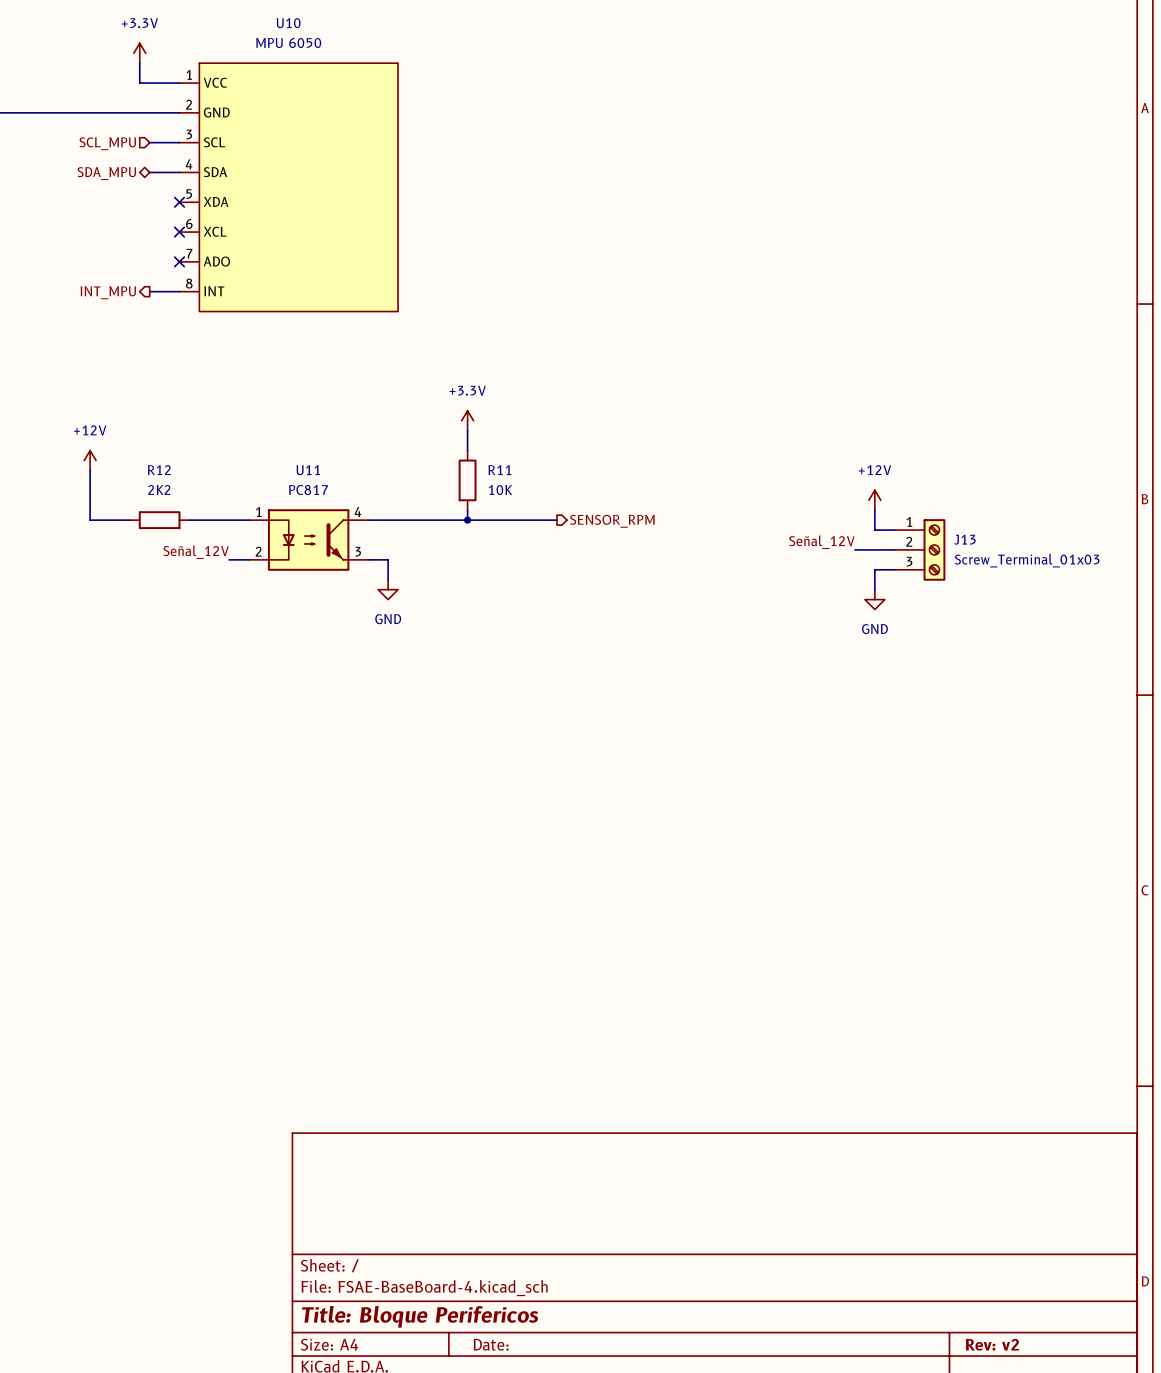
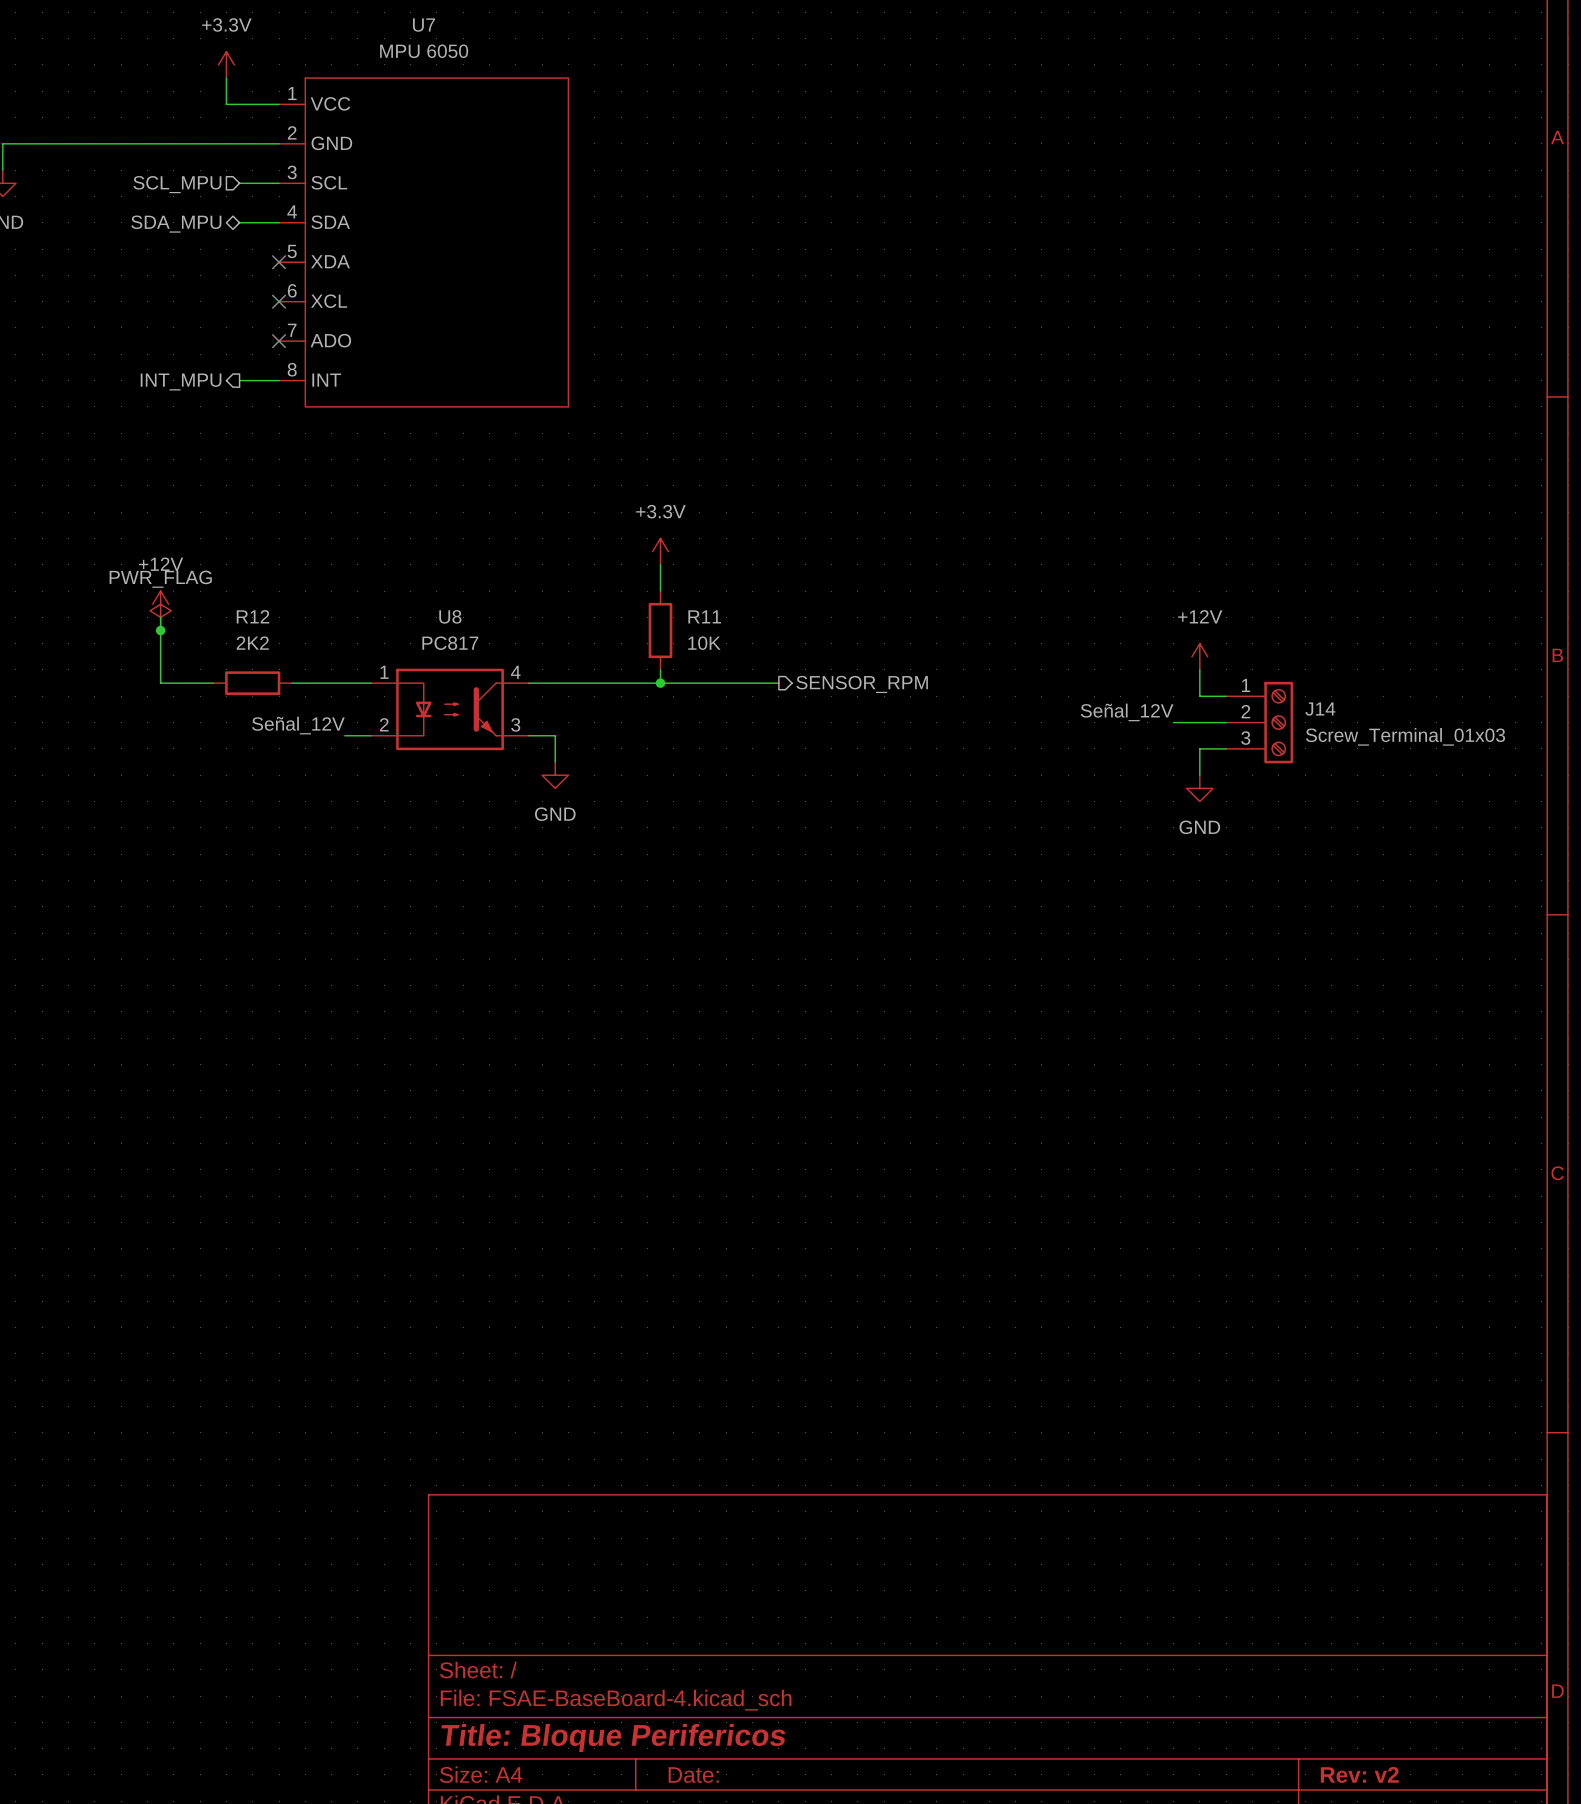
U10 name: U10 (288, 23) -> U7 (423, 25)
power symbol: none -> PWR_FLAG (160, 617)
U11 name: U11 (308, 470) -> U8 (450, 616)
junction: none -> (160, 630)
J13 name: J13 (964, 539) -> J14 (1320, 709)

